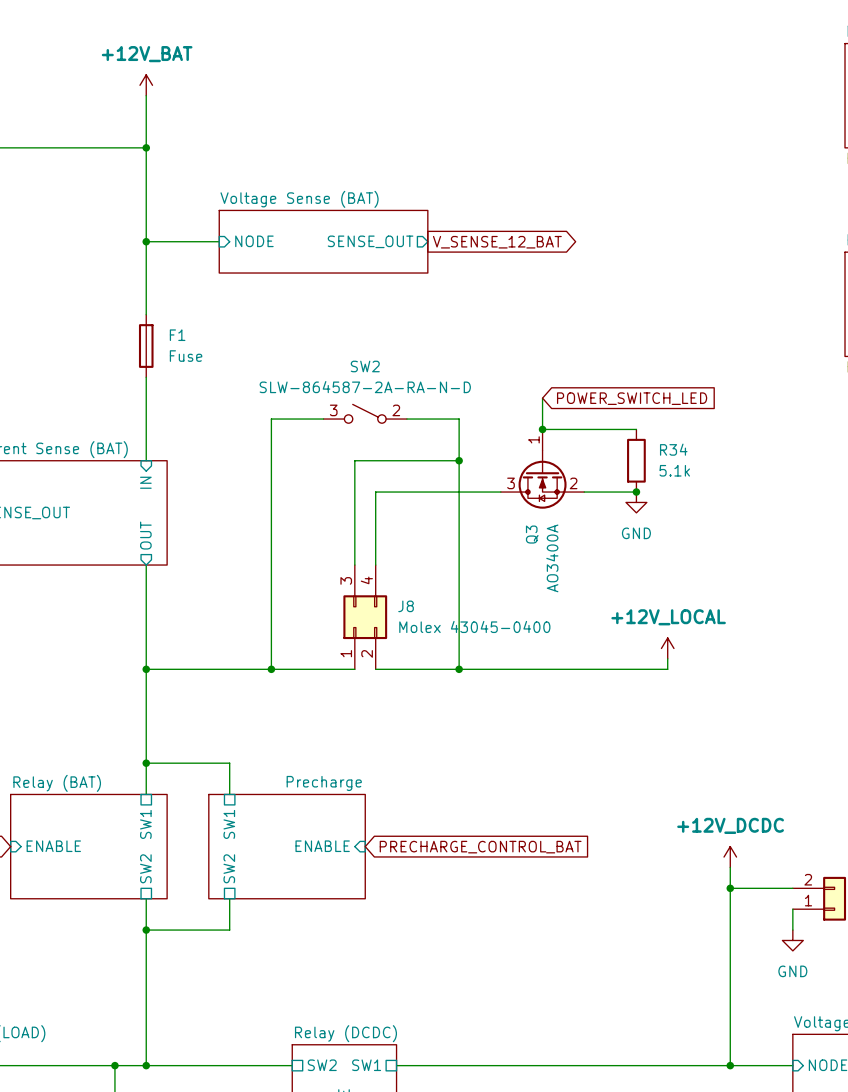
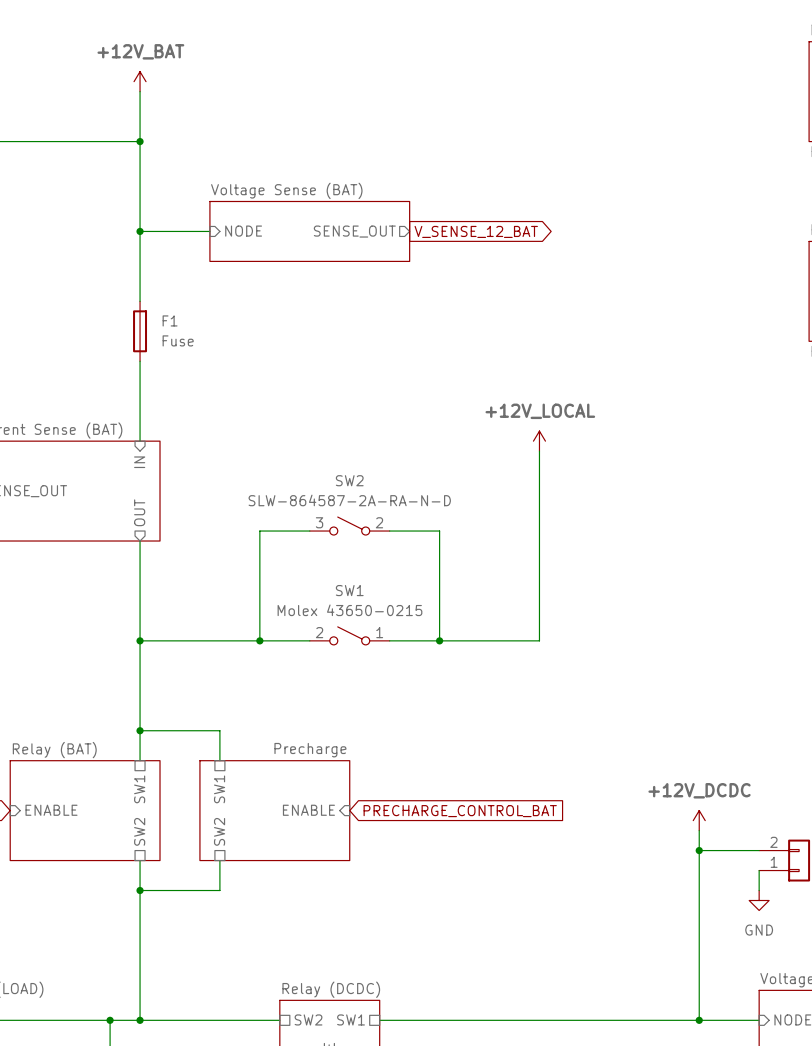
wire: (542, 398) (542, 429) (636, 429) -> none
global label: POWER_SWITCH_LED (632, 398) -> none
SW2 position: (365, 413) -> (349, 526)
wire: (323, 419) (271, 419) (271, 554) -> (309, 531) (259, 531)
wire: (406, 419) (459, 419) (459, 554) -> (389, 531) (439, 531)
junction: (542, 429) -> none
wire: (459, 460) (354, 460) (354, 565) -> none
junction: (459, 460) -> none
power symbol: none -> +12V_LOCAL (539, 441)
R34: 5.1k (636, 460) -> none
Q3: AO3400A (542, 469) -> none
wire: (500, 492) (375, 492) (375, 565) -> none
wire: (584, 492) (636, 492) -> none
junction: (636, 492) -> none
power symbol: GND (636, 502) -> none
J8: Molex 43045-0400 (365, 617) -> none
power symbol: +12V_LOCAL (667, 648) -> none
wire: (667, 658) (667, 669) (563, 669) -> (539, 451) (539, 640)
SW1: none -> Molex 43650-0215 (349, 635)

